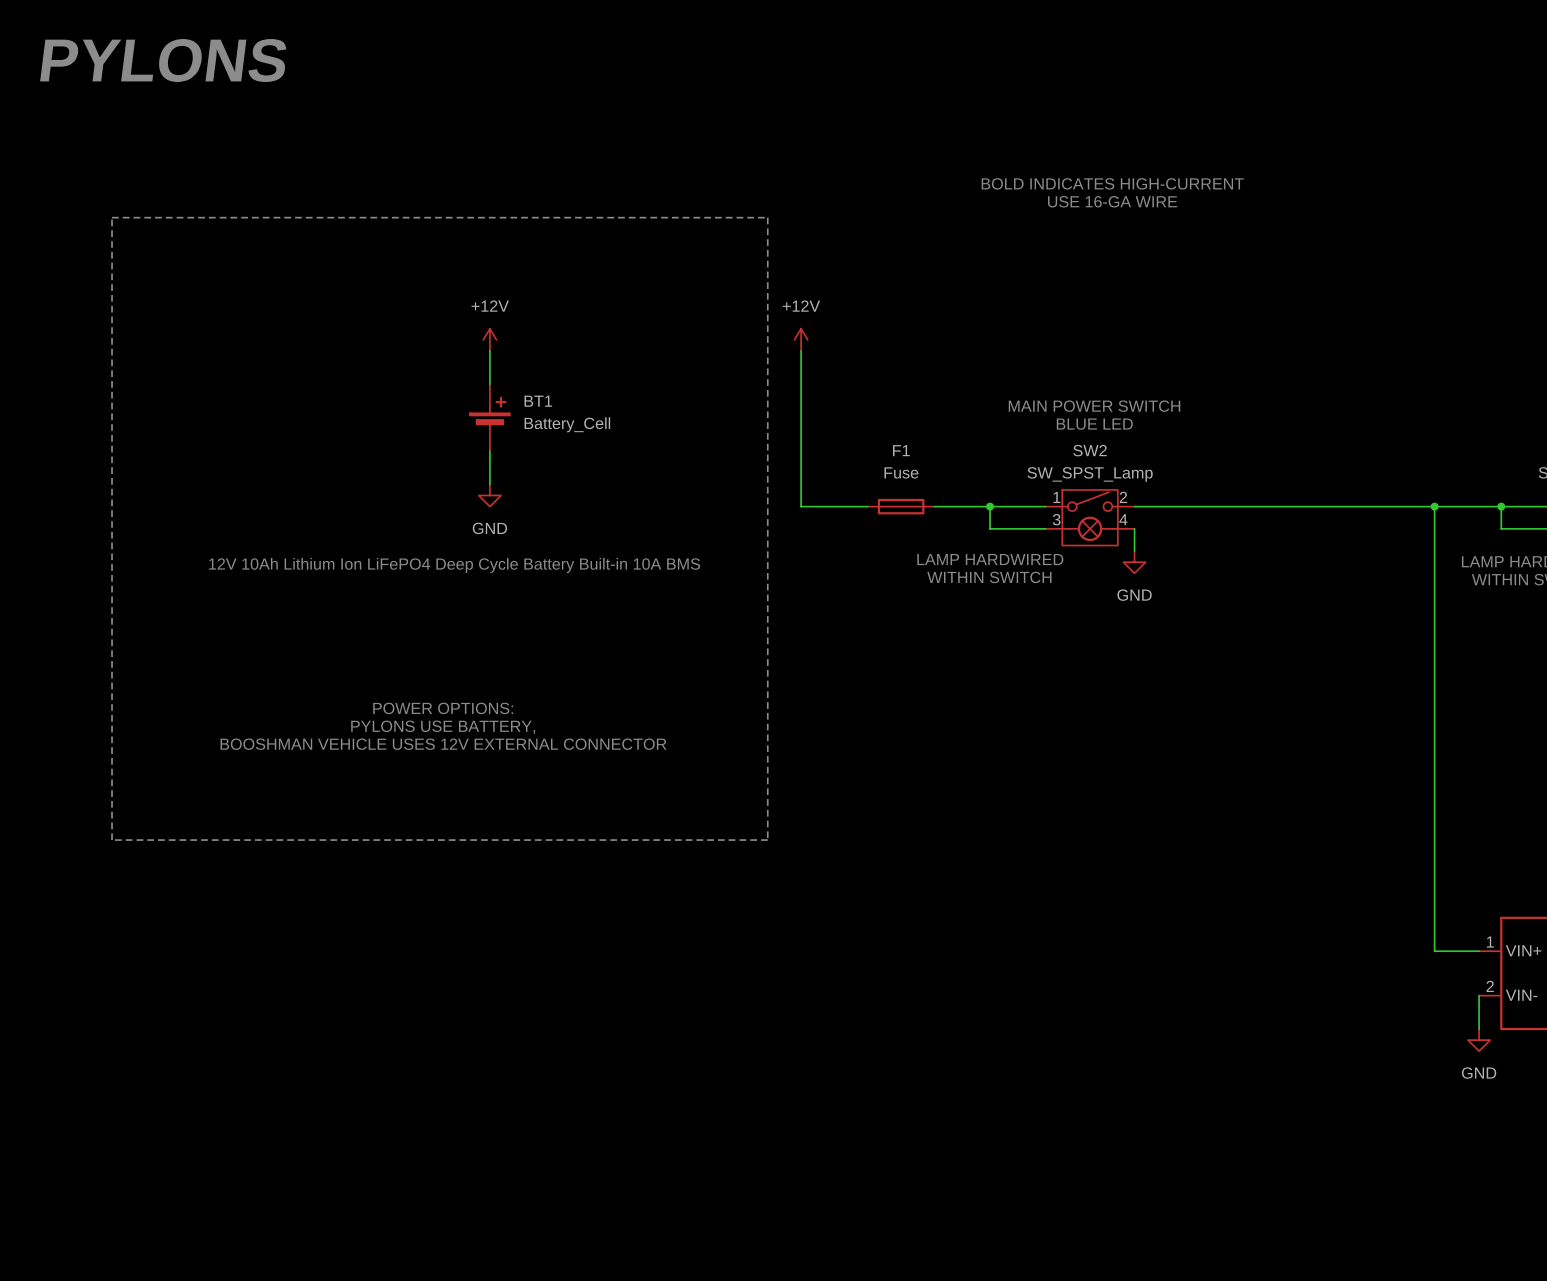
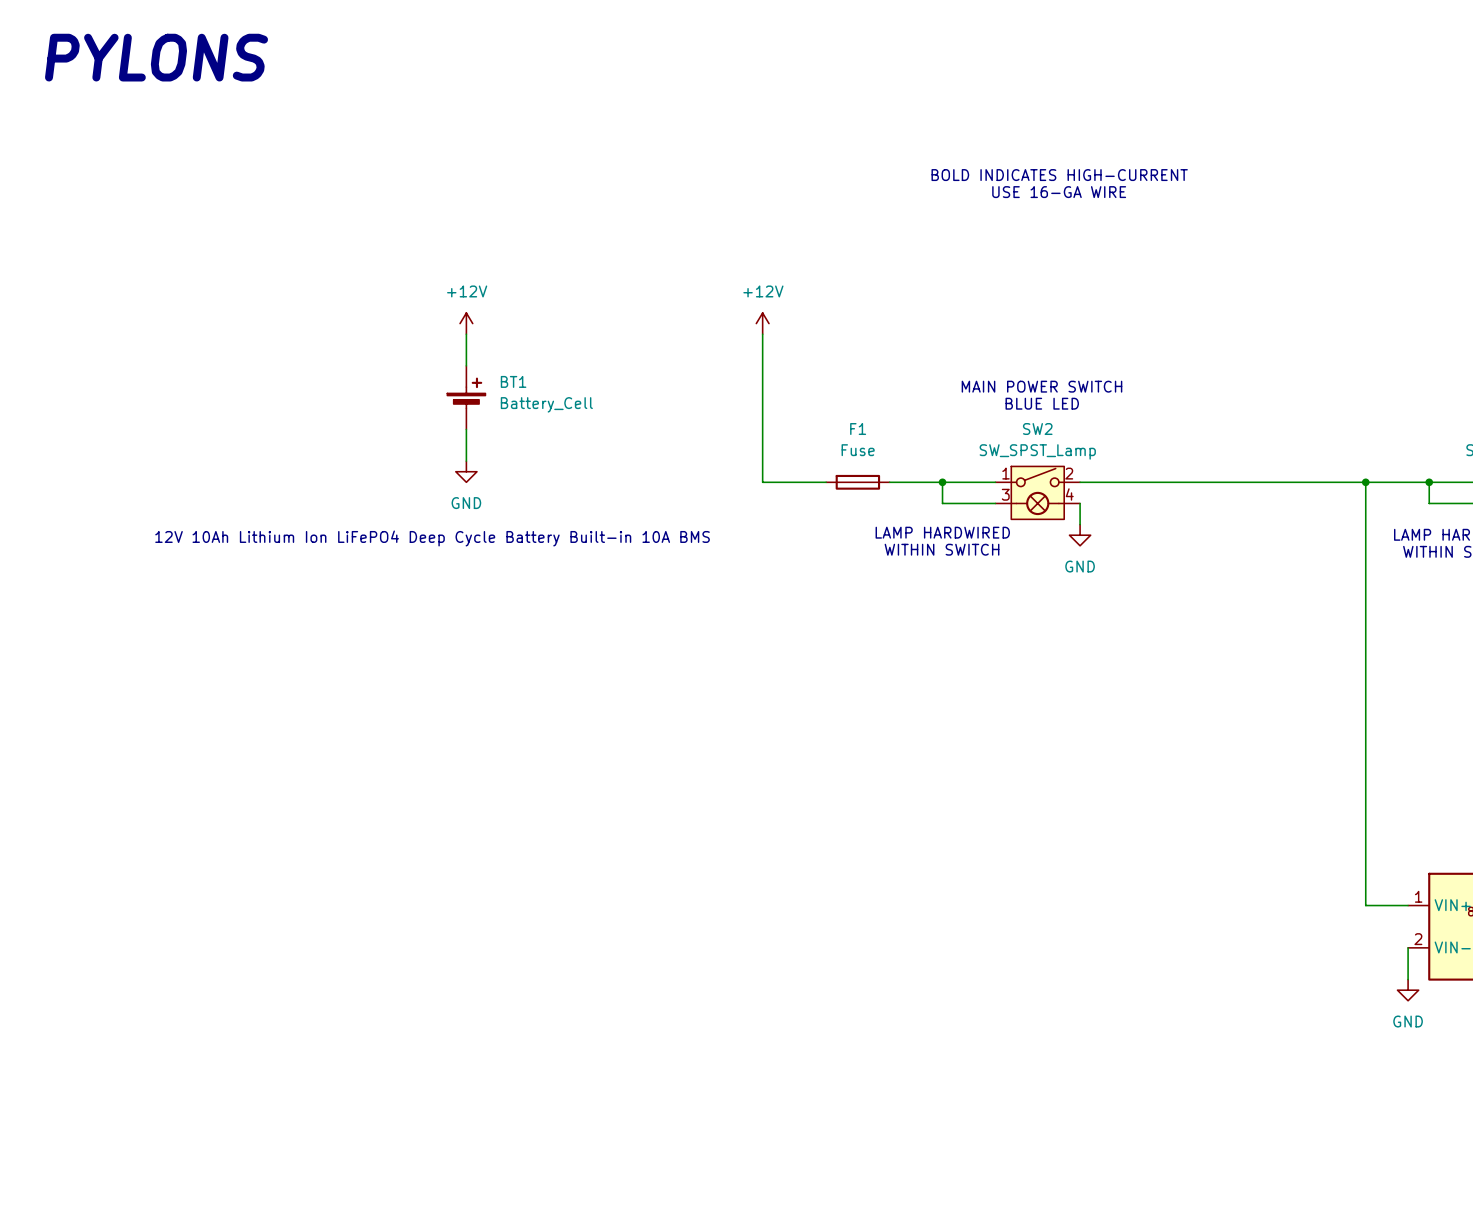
line: (112, 217) (767, 217) (767, 840) (112, 840) (112, 217) -> none
text: POWER OPTIONS: (443, 708) -> none
text: PYLONS USE BATTERY, (443, 727) -> none
text: BOOSHMAN VEHICLE USES 12V EXTERNAL CONNECTOR (443, 744) -> none

